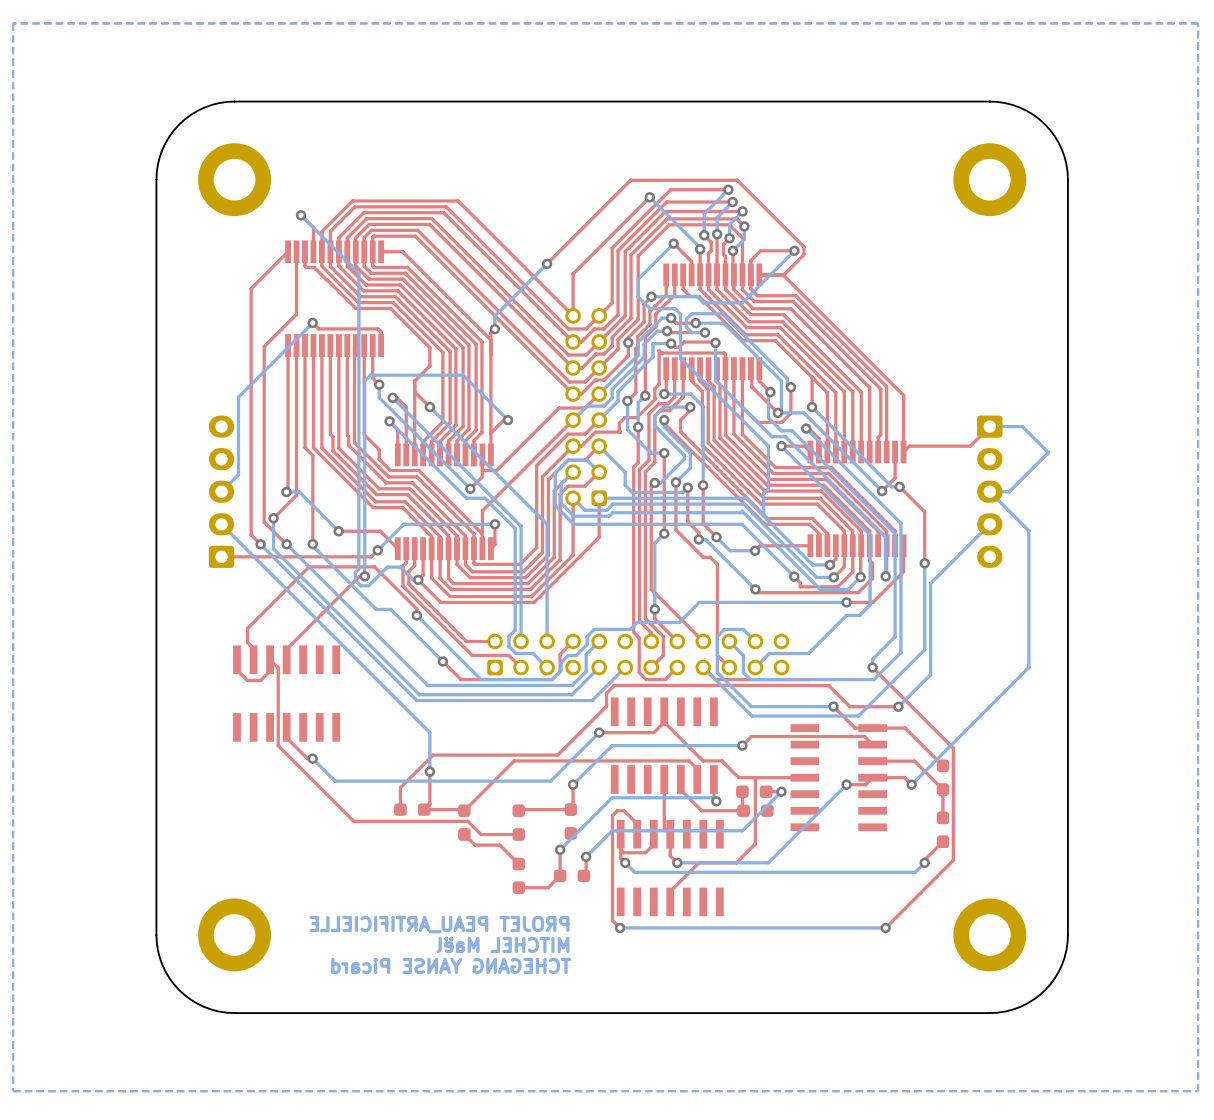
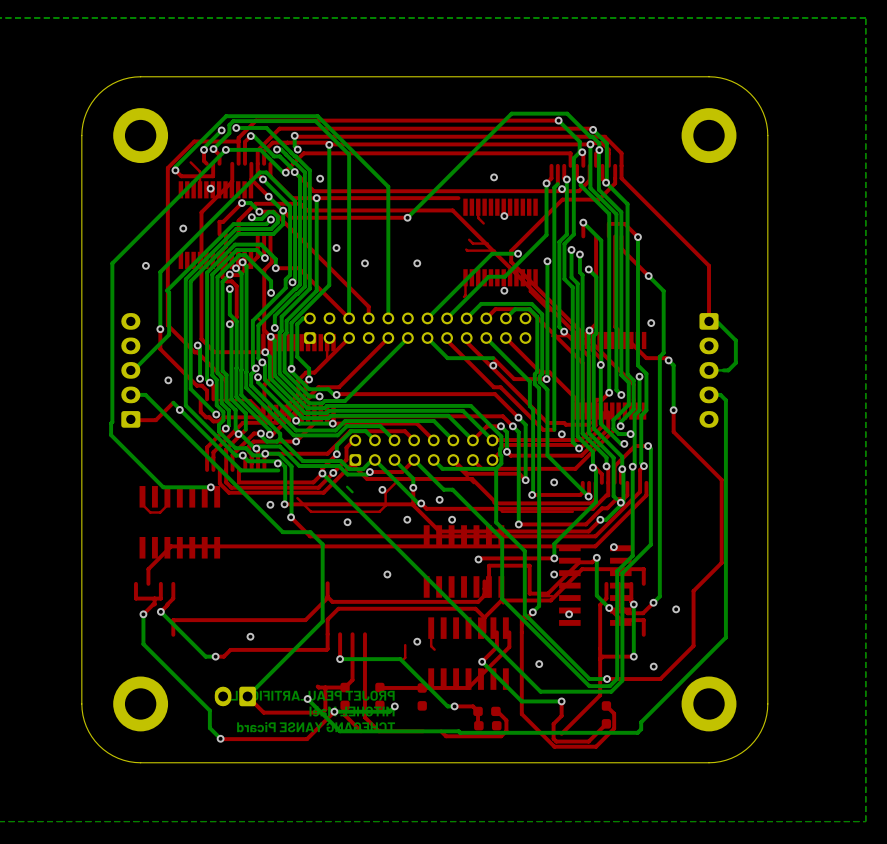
top track: none -> (558, 120) (256, 120) (238, 138) (238, 163)
bottom track: none -> (558, 120) (579, 141) (579, 152)
via: none -> (558, 120)
bottom track: none -> (236, 128) (266, 128) (309, 170) (309, 288) (281, 316) (279, 373) (309, 403) (344, 401) (407, 338)
via: none -> (236, 128)
bottom track: none -> (221, 130) (204, 149)
via: none -> (221, 130)
top track: none -> (593, 129) (279, 128) (257, 150) (257, 176) (263, 179)
bottom track: none -> (593, 129) (606, 143) (606, 182) (627, 204) (627, 374) (633, 380) (633, 409) (620, 422) (620, 426)
via: none -> (593, 129)
top track: none -> (250, 136) (244, 141) (244, 163)
bottom track: none -> (250, 136) (253, 136) (274, 156) (279, 156) (299, 177) (299, 284) (258, 325) (258, 358) (264, 364) (264, 379) (303, 418) (328, 418) (330, 415) (448, 415) (472, 440)
via: none -> (250, 136)
bottom track: none -> (294, 135) (294, 146) (297, 149)
via: none -> (294, 135)
top track: none -> (238, 141) (194, 141) (167, 168) (167, 325) (226, 381) (226, 399)
top track: none -> (287, 142) (272, 142) (264, 151) (264, 163)
top track: none -> (287, 142) (327, 142) (329, 144) (602, 143) (608, 149) (608, 165)
top track: (728, 189) (670, 189) (612, 248) (612, 302) (586, 328) (568, 328) (446, 206) (355, 206) (330, 231) (330, 266) (360, 296) (395, 296) (450, 351) (450, 423) (431, 441) (431, 454) -> none
bottom track: (728, 189) (704, 213) (704, 235) -> none
via: (728, 189) -> none
bottom track: none -> (590, 144) (590, 188) (616, 214) (616, 390) (621, 394)
via: none -> (590, 144)
bottom track: none -> (329, 144) (329, 285) (291, 322) (291, 371) (309, 389) (328, 389) (333, 394)
via: none -> (329, 144)
top track: none -> (213, 149) (219, 155) (219, 163)
bottom track: none -> (213, 149) (229, 133) (229, 125) (233, 121) (315, 121) (349, 154) (349, 318)
via: none -> (213, 149)
top track: (649, 197) (573, 273) (573, 315) (458, 201) (352, 201) (321, 231) (321, 266) (358, 302) (393, 302) (442, 352) (442, 421) (423, 441) (423, 454) -> none
bottom track: (649, 197) (700, 249) -> none
via: (649, 197) -> none
top track: none -> (204, 149) (204, 161) (206, 163)
via: none -> (204, 149)
via: none -> (225, 149)
bottom track: none -> (277, 149) (281, 149) (304, 172) (304, 286) (274, 316) (274, 328)
via: none -> (277, 149)
via: none -> (297, 149)
via: none -> (599, 150)
bottom track: none -> (579, 152) (573, 158) (573, 234) (564, 243) (564, 279) (572, 287) (572, 442) (579, 448)
top track: none -> (582, 152) (583, 165)
via: none -> (582, 152)
top track: (732, 202) (666, 202) (618, 250) (618, 314) (603, 328) (594, 328) (581, 341) (573, 341) (443, 212) (363, 212) (338, 237) (338, 266) (363, 290) (397, 290) (455, 348) (455, 425) (440, 441) (440, 454) -> none
bottom track: (732, 202) (717, 217) (717, 234) -> none
via: (732, 202) -> none
top track: none -> (596, 153) (596, 165)
top track: (742, 211) (665, 211) (625, 251) (625, 315) (586, 355) (568, 355) (431, 218) (366, 218) (347, 237) (347, 266) (366, 284) (400, 284) (463, 347) (463, 426) (448, 441) (448, 454) -> none
bottom track: (742, 211) (729, 224) (729, 238) -> none
via: (742, 211) -> none
bottom track: (301, 215) (358, 273) (358, 568) (355, 572) (355, 580) (360, 585) (368, 585) (387, 567) (400, 567) (413, 579) (418, 579) -> none
via: (301, 215) -> none
top track: none -> (213, 163) (213, 176) (181, 176) (175, 170)
top track: none -> (232, 163) (232, 181) (201, 212) (201, 339) (214, 352) (265, 352)
top track: none -> (251, 163) (251, 179) (268, 196)
top track: none -> (270, 163) (270, 176) (292, 198) (458, 198)
top track: none -> (551, 165) (551, 178) (546, 183)
top track: none -> (557, 165) (557, 184)
top track: none -> (564, 165) (564, 178) (566, 179)
top track: none -> (570, 165) (570, 153) (303, 153) (285, 172)
top track: none -> (576, 165) (576, 178) (580, 179)
top track: none -> (589, 165) (589, 180) (578, 191) (313, 191) (294, 172)
top track: none -> (602, 165) (602, 179) (606, 182)
top track: none -> (615, 165) (615, 183) (598, 199) (562, 199) (511, 250) (511, 262) (633, 384) (633, 412)
bottom track: none -> (175, 170) (175, 166) (226, 116) (317, 116) (388, 186) (388, 318)
via: none -> (175, 170)
top track: (744, 226) (736, 218) (666, 218) (631, 254) (631, 318) (612, 337) (612, 345) (604, 354) (596, 354) (582, 368) (573, 368) (429, 224) (369, 224) (355, 237) (355, 266) (368, 279) (402, 279) (468, 345) (468, 429) (457, 440) (457, 454) -> none
bottom track: (744, 226) (744, 239) (732, 250) -> none
via: (744, 226) -> none
bottom track: none -> (285, 172) (283, 172) (260, 149) (225, 149) (112, 263) (111, 435) (163, 487) (210, 487)
via: none -> (285, 172)
via: none -> (294, 172)
top track: (717, 234) (717, 289) (749, 321) (782, 321) (852, 391) (852, 452) -> none
via: (717, 234) -> none
top track: (704, 235) (711, 242) (711, 250) (708, 253) (708, 289) (746, 327) (780, 327) (844, 391) (844, 452) -> none
bottom track: none -> (263, 179) (290, 206) (290, 275) (285, 279) (285, 288) (252, 320) (253, 368)
via: none -> (263, 179)
via: none -> (320, 178)
top track: (729, 238) (723, 244) (725, 289) (750, 314) (783, 314) (861, 392) (861, 452) -> none
via: (729, 238) -> none
bottom track: none -> (566, 179) (566, 234) (559, 241) (559, 326) (564, 331)
via: none -> (566, 179)
bottom track: none -> (580, 179) (580, 185) (609, 213) (609, 392)
via: none -> (580, 179)
via: none -> (606, 182)
top track: (673, 243) (691, 261) (691, 274) -> none
bottom track: (673, 243) (638, 279) (638, 296) (650, 308) (674, 308) (680, 314) (680, 358) (768, 446) (768, 488) (763, 493) (763, 515) -> none
via: (673, 243) -> none
bottom track: none -> (546, 183) (546, 234) (504, 276) (488, 276) (447, 318)
via: none -> (546, 183)
bottom track: none -> (557, 184) (554, 187) (554, 429)
top track: (700, 249) (700, 289) (745, 334) (777, 334) (835, 392) (835, 452) -> none
via: (700, 249) -> none
via: none -> (210, 188)
top track: (732, 250) (733, 289) (753, 308) (790, 308) (869, 387) (869, 452) -> none
via: (732, 250) -> none
top track: (794, 250) (760, 250) (750, 260) (750, 289) (757, 295) (795, 295) (886, 386) (886, 452) -> none
bottom track: (794, 250) (742, 302) (703, 302) (697, 296) (651, 296) -> none
top track: (288, 251) (251, 288) (251, 534) (260, 544) -> none
top track: (296, 251) (296, 314) (264, 346) (264, 522) (286, 544) -> none
top track: (304, 251) (304, 266) (314, 267) (355, 308) (390, 308) (429, 347) (429, 365) (414, 381) (414, 454) -> none
top track: (381, 251) (402, 251) (490, 340) -> none
bottom track: none -> (268, 196) (283, 210) (283, 224) (273, 233) (238, 233) (190, 281) (190, 388) (216, 414)
via: none -> (268, 196)
bottom track: none -> (316, 198) (316, 290) (286, 320) (284, 371) (309, 396) (319, 396)
via: none -> (316, 198)
top track: (547, 263) (630, 180) (737, 180) (803, 246) (803, 254) (783, 274) (759, 274) -> none
bottom track: (547, 263) (494, 316) (494, 329) -> none
via: (547, 263) -> none
top track: none -> (241, 203) (223, 221) (219, 221) (219, 234)
bottom track: none -> (241, 203) (250, 203) (259, 211)
via: none -> (241, 203)
top track: (666, 274) (666, 295) (649, 311) (649, 324) (637, 336) (635, 392) (627, 401) -> none
top track: (674, 274) (674, 295) (655, 313) (655, 326) (645, 337) (645, 395) -> none
top track: (783, 274) (903, 395) (903, 452) (909, 446) (970, 446) (989, 426) -> (294, 135) (604, 136) (621, 153) (621, 178) (709, 265) (709, 321)
top track: none -> (283, 210) (290, 217) (407, 217)
via: none -> (283, 210)
top track: none -> (259, 211) (273, 211) (368, 306) (368, 318)
via: none -> (259, 211)
via: none -> (504, 216)
bottom track: none -> (251, 217) (261, 218) (268, 212) (273, 212) (277, 216) (277, 222) (271, 229) (236, 229) (185, 279) (185, 405) (235, 455) (242, 455) (248, 461) (279, 461) (285, 467) (284, 504)
via: none -> (251, 217)
bottom track: none -> (407, 217) (511, 113) (567, 113) (590, 136) (592, 136) (599, 143) (598, 189) (621, 212) (621, 375) (628, 382) (628, 404) (613, 420) (613, 428) (618, 434) (627, 434)
via: none -> (407, 217)
via: none -> (270, 219)
top track: none -> (583, 222) (583, 236)
bottom track: none -> (583, 222) (601, 240) (600, 423) (620, 443) (624, 443)
via: none -> (583, 222)
top track: (651, 296) (644, 304) (644, 321) (628, 337) (628, 355) (604, 380) (595, 380) (581, 394) (573, 394) (415, 236) (374, 236) (374, 267) (407, 267) (481, 341) (481, 432) (473, 440) (473, 454) -> none
via: (651, 296) -> none
top track: (690, 296) (699, 296) (743, 340) (775, 340) (827, 392) (827, 452) -> none
via: none -> (183, 228)
top track: none -> (225, 234) (225, 246) (222, 250) (222, 276) (236, 286) (236, 317) (229, 324)
top track: none -> (238, 234) (238, 220) (255, 203) (300, 203) (307, 210) (452, 210) (600, 358) (600, 364)
top track: none -> (257, 234) (257, 256) (239, 275) (229, 274)
top track: none -> (264, 234) (264, 258)
top track: none -> (270, 234) (271, 262) (264, 270) (264, 330) (272, 338) (272, 376) (264, 384) (264, 399)
top track: none -> (596, 236) (596, 323) (589, 330)
top track: none -> (608, 236) (608, 223) (624, 223) (637, 237)
top track: none -> (615, 236) (615, 326) (646, 358) (666, 358) (668, 360)
top track: none -> (621, 236) (621, 248) (648, 276)
bottom track: none -> (637, 237) (637, 365) (646, 373) (646, 410) (641, 415) (641, 463) (643, 466)
via: none -> (637, 237)
bottom track: (671, 318) (662, 318) (638, 341) (638, 355) (599, 394) -> none
via: (671, 318) -> none
top track: (312, 322) (318, 328) (377, 328) (381, 332) (381, 345) -> none
bottom track: (312, 322) (238, 397) (238, 474) (221, 491) -> (270, 219) (266, 224) (233, 224) (167, 290) (169, 292) (169, 334) (133, 370) (130, 370)
via: (312, 322) -> none
bottom track: (695, 323) (723, 323) (781, 381) (781, 409) (777, 412) (803, 412) (882, 491) -> none
via: (695, 323) -> none
top track: (494, 329) (490, 333) (490, 454) -> none
bottom track: (667, 331) (657, 331) (644, 344) (644, 357) (612, 389) (612, 398) (604, 406) (587, 406) (573, 420) -> none
via: (667, 331) -> none
bottom track: none -> (571, 249) (571, 277) (577, 283) (577, 436) (592, 451) (592, 467) (595, 470) (595, 502) (554, 543) (554, 558)
via: none -> (571, 249)
bottom track: (705, 332) (691, 332) (686, 327) (686, 319) (691, 313) (722, 313) (787, 378) (787, 383) (790, 387) -> none
via: (705, 332) -> none
bottom track: none -> (518, 253) (492, 253) (427, 318)
via: none -> (518, 253)
bottom track: none -> (579, 254) (579, 272) (582, 275) (582, 433) (606, 457) (606, 466)
via: none -> (579, 254)
bottom track: none -> (264, 258) (256, 250) (236, 250) (212, 274) (212, 375) (216, 379) (216, 405) (223, 411) (223, 420) (218, 424) (218, 431) (235, 448) (245, 448) (253, 455) (278, 453) (291, 466) (291, 517)
via: none -> (264, 258)
via position: (628, 342) -> (417, 263)
top track: (715, 342) (684, 342) (679, 347) (671, 343) -> none
bottom track: (715, 342) (715, 380) (772, 436) (785, 436) (885, 536) (885, 576) -> none
via: (715, 342) -> none
bottom track: (653, 343) (653, 356) (618, 391) (618, 401) (599, 420) -> none
bottom track: (671, 343) (653, 343) -> none
via: (671, 343) -> none
top track: (288, 345) (288, 490) (286, 492) -> none
top track: (296, 345) (296, 495) (273, 518) -> none
top track: (304, 345) (304, 447) (312, 455) (312, 544) -> none
top track: (313, 345) (313, 447) (373, 507) (402, 507) (431, 536) (431, 578) (450, 596) (531, 596) (573, 555) (573, 498) -> none
top track: (321, 345) (321, 448) (375, 501) (405, 501) (440, 536) (440, 578) (451, 589) (530, 589) (560, 559) (560, 494) (568, 486) (585, 486) (599, 472) -> none
top track: (330, 345) (330, 434) (332, 436) (332, 450) (376, 494) (407, 494) (448, 535) (448, 578) (453, 583) (528, 583) (554, 557) (554, 491) (573, 472) -> none
top track: (338, 345) (338, 448) (379, 488) (409, 488) (457, 535) (457, 564) (470, 577) (525, 577) (548, 554) (548, 479) (568, 460) (585, 460) (599, 446) -> none
top track: (347, 345) (348, 445) (386, 482) (412, 482) (465, 535) (465, 564) (472, 571) (523, 571) (542, 552) (542, 476) (573, 446) (581, 446) (595, 432) (620, 432) (619, 423) (624, 417) (636, 417) (655, 398) (654, 388) (659, 384) (659, 350) (661, 353) (724, 353) (725, 435) (769, 479) (826, 479) (878, 531) (878, 545) -> none
top track: (355, 345) (354, 442) (388, 476) (417, 476) (473, 533) (474, 564) (520, 564) (536, 547) (536, 465) (568, 434) (585, 434) (599, 420) -> none
top track: (364, 345) (364, 434) (379, 449) (379, 459) (390, 470) (418, 470) (482, 534) -> none
top track: (372, 345) (372, 378) (379, 384) -> none
bottom track: none -> (547, 261) (546, 379)
via: none -> (547, 261)
bottom track: none -> (242, 262) (246, 266) (246, 387) (293, 435) (337, 435) (346, 426) (380, 426) (394, 440)
via: none -> (242, 262)
via: none -> (364, 263)
via: none -> (145, 265)
top track: none -> (275, 268) (298, 268) (349, 318)
bottom track: none -> (275, 268) (275, 259) (261, 244) (235, 244) (207, 272) (207, 379) (209, 382)
via: none -> (275, 268)
bottom track: none -> (236, 268) (241, 273) (241, 395) (280, 433) (280, 438)
via: none -> (236, 268)
bottom track: none -> (588, 269) (596, 277) (596, 333) (593, 336) (593, 428) (622, 456) (623, 470) (623, 502) (606, 519) (600, 519)
via: none -> (588, 269)
bottom track: none -> (229, 274) (222, 281) (222, 371) (226, 375) (226, 401) (235, 410) (235, 429) (254, 448) (258, 446) (279, 446) (299, 466) (339, 466) (347, 474) (367, 474) (369, 472)
via: none -> (229, 274)
bottom track: none -> (648, 276) (663, 291) (663, 352) (659, 356) (659, 596) (653, 602)
via: none -> (648, 276)
top track: (674, 368) (674, 396) (667, 403) (659, 403) (648, 413) (648, 460) (639, 469) (639, 621) (651, 632) (651, 641) -> none
top track: (683, 368) (683, 396) (669, 410) (660, 410) (654, 416) (654, 462) (645, 472) (645, 618) (663, 636) (663, 655) (651, 667) -> none
top track: (691, 368) (691, 380) (702, 391) (702, 445) (761, 504) (817, 504) (844, 531) (844, 566) (833, 577) -> none
top track: (700, 368) (700, 381) (708, 389) (708, 442) (763, 498) (820, 498) (852, 531) (852, 571) (837, 586) (800, 586) (800, 582) (794, 576) -> none
top track: (708, 368) (708, 381) (714, 386) (714, 440) (764, 491) (821, 491) (861, 531) (860, 577) -> none
top track: (717, 368) (717, 381) (719, 384) (719, 437) (767, 485) (823, 485) (869, 531) (869, 560) (872, 563) (872, 578) (858, 592) (758, 592) (755, 589) -> none
top track: (733, 368) (733, 434) (773, 473) (828, 473) (886, 531) (885, 576) -> none
top track: (742, 368) (742, 434) (775, 467) (831, 467) (895, 531) (895, 545) -> none
bottom track: none -> (292, 282) (295, 279) (295, 201) (266, 172) (259, 172) (160, 272) (160, 329)
via: none -> (292, 282)
top track: (812, 377) (812, 407) -> none
bottom track: none -> (229, 289) (229, 314) (236, 321) (236, 397) (269, 430) (269, 434)
via: none -> (229, 289)
bottom track: (379, 384) (379, 397) (470, 488) -> none
via: (379, 384) -> none
via: none -> (504, 290)
top track: (790, 387) (790, 413) (781, 422) (757, 422) (742, 407) -> none
via: (790, 387) -> none
bottom track: none -> (271, 292) (271, 281) (245, 255) (239, 255) (217, 277) (217, 372) (221, 377) (221, 403) (228, 410) (228, 425) (225, 428)
via: none -> (271, 292)
top track: (414, 391) (429, 407) -> none
bottom track: (770, 392) (768, 394) (768, 417) (781, 430) (792, 430) (895, 533) (895, 636) (872, 659) (872, 667) -> none
via: (770, 392) -> none
top track: (599, 394) (585, 408) (559, 408) (496, 470) (482, 469) -> none
bottom track: (664, 394) (690, 394) (703, 406) (703, 485) -> none
via: (664, 394) -> none
bottom track: (645, 395) (638, 402) (638, 427) -> none
via: (645, 395) -> none
top track: (392, 397) (396, 397) (406, 407) (406, 454) -> none
bottom track: (392, 397) (521, 526) (521, 641) -> none
via: (392, 397) -> none
bottom track: (627, 401) (627, 429) (650, 453) (664, 453) -> none
via: (627, 401) -> none
bottom track: (429, 407) (547, 524) (547, 641) -> none
via: (429, 407) -> none
part rotation: 0° (586, 407) -> 90° clockwise (423, 450)
part position: (586, 407) -> (423, 450)
top track: (690, 407) (690, 410) (680, 420) (680, 431) (767, 518) (812, 518) (827, 533) (827, 545) -> none
bottom track: (690, 407) (663, 407) (654, 416) (654, 425) (684, 455) (684, 459) (660, 482) (654, 482) -> none
via: (690, 407) -> none
bottom track: (812, 407) (891, 486) (899, 486) -> none
via: (812, 407) -> none
via: (777, 412) -> none
top track: (508, 420) (503, 420) (490, 433) -> none
bottom track: (508, 420) (463, 375) (370, 375) (364, 381) (364, 576) -> none
via: (508, 420) -> none
top track: (573, 420) (482, 510) (482, 548) -> none
top track: (664, 420) (664, 423) (764, 524) (809, 524) (818, 533) (818, 545) -> none
bottom track: (664, 420) (664, 427) (690, 453) (690, 467) (675, 482) -> none
via: (664, 420) -> none
bottom track: (389, 421) (466, 498) (484, 498) (515, 528) (515, 630) (508, 636) (508, 646) -> none
via: (389, 421) -> none
bottom track: none -> (309, 318) (303, 318) (297, 324) (297, 356) (309, 368) (309, 379)
bottom track: none -> (466, 318) (481, 303) (531, 303) (542, 314) (542, 373) (539, 376) (539, 381) (547, 389) (547, 455) (588, 496)
top track: none -> (486, 318) (495, 309) (528, 309) (582, 363) (582, 412)
bottom track: none -> (505, 318) (515, 309) (529, 309) (537, 316) (537, 371) (534, 374) (534, 384) (539, 388) (539, 605) (532, 612)
bottom track: (1000, 426) (1022, 426) (1048, 452) (1009, 491) -> (716, 321) (735, 340) (735, 362) (728, 370) (723, 370)
top track: (638, 427) (638, 462) (633, 467) (633, 632) (639, 637) (639, 672) (646, 679) (665, 679) (677, 667) -> none
via: (638, 427) -> none
bottom track: (806, 428) (900, 523) (900, 652) (873, 679) (750, 679) (743, 672) (743, 655) (729, 641) -> none
via: (806, 428) -> none
via: none -> (651, 323)
bottom track: none -> (229, 324) (231, 325) (231, 399) (245, 413) (245, 429)
via: none -> (229, 324)
via: none -> (274, 328)
top track: none -> (160, 329) (160, 349) (196, 385) (201, 385) (207, 390) (207, 399)
via: none -> (160, 329)
bottom track: none -> (589, 330) (588, 432) (613, 457) (613, 496) (616, 499)
via: none -> (589, 330)
top track: none -> (564, 331) (589, 356) (589, 424) (547, 422) (466, 342) (466, 338)
via: none -> (564, 331)
bottom track: (599, 446) (625, 472) (625, 485) (632, 492) (683, 492) (687, 487) -> none
bottom track: (781, 446) (870, 534) (870, 604) (859, 615) (846, 615) (808, 653) (769, 653) (755, 667) -> none
via: (781, 446) -> none
bottom track: none -> (270, 336) (274, 340) (274, 375) (307, 408) (324, 408) (326, 405) (470, 405) (501, 436) (501, 463) (496, 468)
via: none -> (270, 336)
top track: none -> (349, 338) (314, 372) (306, 372) (298, 380) (298, 394) (275, 417) (223, 417) (219, 421) (213, 421) (200, 411) (200, 399)
top track: none -> (388, 338) (339, 387) (318, 387) (272, 434) (269, 434)
bottom track: none -> (427, 338) (447, 358) (493, 358)
top track: none -> (447, 338) (447, 340) (493, 387) (500, 387) (543, 429) (554, 429)
bottom track: none -> (486, 338) (529, 381) (529, 406) (533, 409) (532, 494)
top track: none -> (505, 338) (540, 372) (549, 372) (576, 399) (576, 412)
top track: (878, 452) (878, 437) (880, 434) (880, 389) (793, 301) (754, 301) (742, 289) (742, 237) (729, 224) (669, 224) (638, 255) (638, 319) (618, 339) (618, 349) (585, 382) (569, 382) (417, 230) (371, 230) (364, 237) (364, 266) (371, 273) (405, 273) (476, 344) (476, 430) (465, 440) (465, 454) -> none
top track: (895, 452) (895, 478) (882, 491) -> none
top track: (664, 453) (664, 533) -> none
via: (664, 453) -> none
bottom track: none -> (197, 345) (200, 347) (200, 378)
via: none -> (197, 345)
bottom track: none -> (265, 352) (269, 356) (269, 377) (305, 413) (326, 413) (328, 410) (462, 410) (492, 440)
via: none -> (265, 352)
bottom track: (573, 472) (561, 484) (561, 503) (573, 516) (609, 516) (612, 512) (742, 511) -> none
bottom track: (599, 472) (587, 460) (568, 460) (555, 473) (555, 505) (573, 524) (741, 524) (794, 576) -> none
top track: none -> (493, 358) (514, 379) (546, 379)
bottom track: none -> (668, 360) (673, 365) (673, 410)
via: none -> (668, 360)
via: none -> (262, 362)
top track: (654, 482) (651, 486) (651, 589) (703, 641) -> none
via: (654, 482) -> none
top track: (675, 482) (675, 529) (703, 557) (710, 557) (717, 564) (717, 655) (729, 667) -> none
via: (675, 482) -> none
via: none -> (600, 364)
top track: (703, 485) (703, 523) (716, 537) -> none
top track: (899, 486) (924, 511) (924, 563) -> none
via: (899, 486) -> none
top track: (687, 487) (687, 521) (698, 532) (698, 539) -> none
via: (687, 487) -> none
via: (470, 488) -> none
bottom track: none -> (253, 368) (251, 374) (251, 385) (296, 430) (335, 430) (345, 421) (433, 421) (453, 440)
via: none -> (255, 368)
via: none -> (291, 368)
via: (882, 491) -> none
bottom track: (989, 491) (1028, 530) (1028, 667) (911, 784) -> none
bottom track: (286, 492) (299, 492) (338, 531) -> none
via: (286, 492) -> none
bottom track: (573, 498) (585, 510) (606, 510) (613, 504) (743, 504) (753, 513) -> none
top track: (599, 498) (599, 537) (534, 602) (440, 602) (418, 579) (423, 575) (423, 548) -> none
bottom track: (599, 498) (746, 498) (812, 564) (829, 564) -> none
bottom track: none -> (258, 377) (258, 382) (299, 423) (332, 423)
via: none -> (258, 377)
bottom track: none -> (639, 376) (639, 410) (634, 415) (632, 555) (617, 571) (617, 678) (609, 686) (589, 686) (502, 598) (502, 539) (452, 489) (443, 489) (414, 460)
via: none -> (639, 376)
via: none -> (200, 378)
top track: none -> (309, 379) (305, 383) (305, 394) (277, 422) (242, 422) (213, 452) (213, 469)
via: none -> (309, 379)
via: none -> (546, 379)
via: none -> (168, 380)
top track: none -> (209, 382) (213, 386) (213, 399)
via: none -> (209, 382)
bottom track: (742, 511) (820, 589) (848, 589) (860, 577) -> none
bottom track: (753, 513) (816, 577) (833, 577) -> none
bottom track: (273, 518) (273, 549) (419, 694) (571, 694) (599, 667) -> none
via: (273, 518) -> none
top track: none -> (609, 392) (602, 399) (595, 399) (595, 425) (581, 440) (492, 440)
via: none -> (609, 392)
top track: none -> (333, 394) (494, 394) (518, 417)
bottom track: (221, 524) (429, 732) (429, 771) -> (130, 394) (145, 394) (282, 532) (310, 532) (322, 544) (322, 621) (247, 696)
top track: (494, 524) (494, 544) (490, 548) -> none
bottom track: (494, 524) (403, 524) (377, 550) -> none
via: none -> (621, 394)
bottom track: (989, 524) (930, 583) (930, 674) (898, 706) -> (709, 394) (720, 394) (725, 400) (725, 637) (641, 722) (641, 729) (637, 732) (339, 731) (307, 698)
via: none -> (319, 396)
via: (338, 531) -> none
bottom track: (664, 533) (654, 543) (654, 609) -> none
via: (664, 533) -> none
bottom track: none -> (173, 402) (241, 470) (278, 470)
bottom track: (716, 537) (730, 550) (755, 550) -> none
via: (716, 537) -> none
bottom track: (698, 539) (705, 539) (755, 589) -> none
via: (698, 539) -> none
bottom track: (260, 544) (416, 700) (592, 700) (625, 667) -> none
via: (260, 544) -> none
bottom track: (286, 544) (427, 685) (572, 685) (586, 671) (586, 654) (599, 641) -> none
bottom track: (312, 544) (376, 609) (390, 609) (442, 661) -> none
via: (312, 544) -> none
top track: none -> (673, 410) (673, 431) (721, 479) (721, 562) (693, 591) (693, 645) (660, 679) (607, 679)
via: none -> (673, 410)
top track: (810, 545) (759, 545) (755, 550) -> none
top track: (903, 545) (903, 571) (872, 602) (846, 602) -> none
top track: none -> (601, 412) (601, 426) (580, 448) (575, 444) (504, 444) (492, 460)
top track: none -> (608, 412) (608, 429) (581, 455) (510, 455) (506, 451)
top track: (406, 548) (406, 563) (402, 566) (402, 586) (472, 655) (508, 655) (521, 667) -> none
top track: (414, 548) (414, 565) (408, 571) (408, 583) (466, 641) (494, 641) -> none
via: none -> (216, 414)
top track: (377, 550) (371, 556) (221, 556) -> (173, 402) (155, 420) (130, 419)
via: (377, 550) -> none
via: (755, 550) -> none
bottom track: none -> (518, 417) (525, 424) (525, 480)
via: none -> (518, 417)
via: none -> (296, 420)
top track: none -> (332, 423) (416, 423) (433, 440)
via: none -> (332, 423)
bottom track: (924, 563) (924, 649) (858, 716) (751, 716) (703, 667) -> none
via: (924, 563) -> none
via: (829, 564) -> none
via: none -> (620, 426)
top track: none -> (500, 426) (487, 426) (472, 440)
bottom track: none -> (500, 426) (506, 432) (506, 451)
via: none -> (500, 426)
top track: none -> (512, 426) (502, 416) (321, 416) (296, 441) (253, 441) (249, 445) (249, 452) (251, 454) (251, 469)
bottom track: none -> (512, 426) (518, 432) (518, 524)
via: none -> (512, 426)
top track: none -> (225, 428) (207, 447) (207, 469)
via: none -> (225, 428)
top track: none -> (245, 429) (226, 449) (226, 482) (231, 487) (318, 487) (346, 459) (346, 447) (355, 440)
top track: none -> (613, 430) (575, 468) (481, 468) (472, 460)
top track: none -> (260, 433) (254, 433) (232, 454) (232, 469)
bottom track: none -> (260, 433) (266, 441) (277, 441) (280, 438)
via: none -> (260, 433)
top track: (364, 576) (359, 576) (286, 649) (286, 659) -> none
via: none -> (269, 434)
via: (833, 577) -> none
via: (860, 577) -> none
via: (418, 579) -> none
bottom track: none -> (280, 438) (302, 461) (341, 461) (349, 469) (362, 469) (372, 460) (374, 460) (418, 503) (421, 503)
bottom track: none -> (374, 440) (365, 431) (351, 431) (336, 445) (336, 454)
top track: none -> (414, 440) (404, 431) (350, 431) (327, 453) (265, 453) (264, 469)
via: none -> (296, 441)
via: (755, 589) -> none
via: none -> (624, 443)
top track: none -> (648, 446) (634, 446) (614, 466) (614, 482)
bottom track: none -> (648, 446) (650, 448) (650, 544) (622, 573) (622, 680) (611, 691) (540, 691) (322, 473)
via: none -> (648, 446)
top track: none -> (256, 448) (258, 469)
via: none -> (256, 448)
via: none -> (579, 448)
via: none -> (506, 451)
via: none -> (265, 453)
bottom track: (846, 602) (699, 602) (679, 622) (637, 622) (630, 629) (594, 629) (587, 636) (587, 644) (576, 655) (568, 655) (561, 662) (561, 670) (552, 679) (480, 679) (416, 615) -> none
via: (846, 602) -> none
top track: none -> (336, 454) (322, 468) (322, 473) (313, 482) (238, 482) (238, 469)
via: none -> (336, 454)
top track: none -> (242, 455) (245, 457) (245, 469)
via: none -> (242, 455)
via: (654, 609) -> none
bottom track: none -> (394, 460) (413, 478) (413, 487)
top track: none -> (414, 460) (402, 472) (369, 472)
bottom track: none -> (433, 460) (442, 468) (496, 468)
top track: none -> (453, 460) (467, 473) (519, 473) (525, 480)
top track: (416, 615) (416, 609) (374, 566) (309, 566) (247, 628) (247, 642) (253, 648) (253, 659) -> none
top track: none -> (352, 464) (367, 478) (472, 478) (496, 503) (591, 503) (595, 499) (595, 482)
top track: none -> (352, 464) (323, 492) (228, 492) (219, 483) (219, 469)
top track: none -> (643, 466) (640, 469) (640, 491) (595, 536) (310, 536) (291, 517)
via: none -> (643, 466)
top track: none -> (606, 466) (608, 468) (608, 495) (593, 508) (426, 508) (421, 503)
via: none -> (606, 466)
via: none -> (632, 466)
top track: none -> (592, 467) (601, 474) (601, 482)
via: none -> (592, 467)
bottom track: none -> (496, 468) (496, 522) (524, 551) (524, 614) (589, 679) (607, 679)
via: none -> (622, 469)
top track: none -> (620, 470) (620, 482)
via: none -> (369, 472)
via: none -> (322, 473)
via: none -> (333, 472)
via: none -> (525, 480)
via: none -> (554, 482)
bottom track: (755, 641) (743, 629) (724, 629) (717, 636) (717, 672) (751, 706) (833, 706) -> none
top track: none -> (582, 482) (582, 492) (580, 494) (532, 494)
top track: none -> (589, 482) (588, 496)
top track: none -> (627, 482) (627, 495) (623, 499) (616, 499) (607, 508) (602, 508) (585, 524) (518, 524)
top track: none -> (646, 482) (646, 495) (595, 546) (171, 546) (148, 569) (148, 583)
via: none -> (210, 487)
top track: none -> (413, 487) (413, 505) (439, 531) (588, 531) (600, 519)
via: none -> (413, 487)
via: none -> (382, 489)
bottom track: (516, 653) (533, 653) (547, 667) -> none
part position: (638, 654) -> (417, 328)
via: none -> (532, 494)
top track: (270, 659) (278, 667) (278, 745) (353, 821) (467, 821) (481, 834) (518, 834) -> none
via: none -> (588, 496)
via: (442, 661) -> none
via: none -> (439, 499)
top track: (872, 667) (953, 748) (953, 860) (885, 927) -> none
via: none -> (421, 503)
via: none -> (284, 504)
top track: none -> (413, 504) (284, 504)
via: none -> (270, 504)
via: none -> (291, 517)
via: none -> (407, 519)
via: none -> (452, 519)
via: none -> (600, 519)
via: none -> (347, 522)
via: none -> (518, 524)
top track: (833, 706) (855, 728) (905, 728) (942, 765) -> none
via: (833, 706) -> none
top track: (898, 706) (849, 706) (828, 685) (614, 685) (606, 693) (606, 706) (557, 755) (433, 755) (400, 787) (400, 809) -> none
via: (898, 706) -> none
via: none -> (613, 547)
top track: (286, 727) (286, 737) (307, 758) (312, 758) -> none
top track: (599, 732) (653, 732) (664, 722) (703, 760) (722, 760) (738, 777) (804, 777) -> none
bottom track: (599, 732) (550, 781) (335, 781) (312, 758) -> none
via: (599, 732) -> none
top track: none -> (596, 557) (592, 562) (579, 562) (548, 593) (529, 593) (529, 565) (489, 565) (489, 595) (484, 595)
bottom track: none -> (596, 557) (596, 595) (609, 608)
via: none -> (596, 557)
top track: none -> (554, 558) (478, 559)
via: none -> (554, 558)
via: none -> (478, 559)
top track: (872, 744) (864, 736) (751, 736) (742, 745) -> none
bottom track: (742, 745) (612, 745) (573, 784) -> none
via: (742, 745) -> none
via: (312, 758) -> none
top track: (872, 761) (914, 761) (942, 789) (942, 817) -> none
via: none -> (387, 574)
via: none -> (554, 574)
top track: (429, 771) (429, 803) (424, 809) (464, 810) (514, 760) (689, 760) (697, 769) (697, 779) -> none
via: (429, 771) -> none
top track: none -> (484, 581) (484, 595)
top track: none -> (327, 583) (327, 597) (305, 620) (173, 620) (173, 634)
top track: none -> (160, 583) (160, 598) (135, 598) (135, 583)
top track: none -> (173, 583) (173, 598) (160, 611)
top track: none -> (606, 583) (606, 598) (600, 604) (600, 695) (561, 733)
top track: none -> (618, 583) (618, 604) (627, 613) (643, 613) (653, 602)
top track: none -> (631, 583) (631, 601) (633, 604)
top track: none -> (643, 583) (643, 569) (582, 569) (550, 600) (501, 600) (484, 617)
top track: (755, 777) (755, 843) (736, 862) (698, 862) (670, 891) (670, 901) -> none
part: (942, 777) -> none
top track: (664, 779) (664, 828) (670, 834) (670, 855) (677, 862) -> none
top track: (680, 779) (680, 789) (701, 810) (743, 810) (742, 791) -> none
top track: (573, 784) (573, 807) (570, 809) (518, 810) -> none
via: (573, 784) -> none
bottom track: (846, 784) (768, 862) (677, 862) -> none
via: (846, 784) -> none
top track: (911, 784) (904, 777) (872, 777) (865, 784) (846, 784) -> none
via: (911, 784) -> none
top track: none -> (484, 595) (478, 601) (332, 601) (327, 597)
part: (754, 791) -> none
bottom track: (781, 791) (742, 830) (612, 830) (586, 856) -> none
via: (781, 791) -> none
top track: none -> (154, 598) (154, 604) (143, 614)
via: none -> (653, 602)
bottom track: (716, 801) (712, 797) (612, 797) (560, 849) -> none
via: (716, 801) -> none
bottom track: none -> (633, 604) (633, 656)
via: none -> (633, 604)
top track: none -> (609, 608) (621, 620) (643, 620) (643, 634)
via: none -> (609, 608)
part: (412, 809) -> none
via: none -> (676, 609)
part: (755, 810) -> none
bottom track: none -> (160, 611) (205, 656) (215, 656)
via: none -> (160, 611)
top track: none -> (532, 612) (527, 617) (521, 617) (521, 714) (554, 746) (596, 746) (614, 728) (614, 713) (606, 705)
via: none -> (532, 612)
bottom track: none -> (143, 614) (143, 644) (209, 710) (209, 728) (220, 738)
via: none -> (143, 614)
via: none -> (569, 614)
top track: none -> (484, 617) (475, 608) (338, 608) (327, 619) (326, 649) (230, 649) (223, 656) (215, 656)
top track: none -> (484, 617) (484, 632)
part: (570, 821) -> none
part: (464, 822) -> none
part: (518, 822) -> none
part: (942, 829) -> none
top track: (464, 834) (474, 845) (499, 845) (518, 863) -> none
top track: (637, 834) (637, 823) (624, 810) (617, 810) (612, 815) (612, 920) (620, 927) -> none
top track: (653, 834) (653, 844) (645, 852) (623, 852) (620, 849) -> none
top track: none -> (496, 632) (496, 647) (482, 661)
top track: none -> (509, 632) (509, 647) (468, 687) (379, 687)
top track: (942, 841) (924, 859) (924, 862) -> none
top track: none -> (340, 634) (340, 659)
top track: none -> (352, 634) (352, 680) (345, 687) (317, 686)
top track: none -> (364, 634) (364, 717) (378, 731) (423, 731)
via: none -> (250, 636)
top track: (560, 849) (560, 875) (548, 887) (518, 887) -> none
via: (560, 849) -> none
via: none -> (417, 641)
via: (586, 856) -> none
via: (625, 862) -> none
via position: (677, 862) -> (482, 661)
bottom track: (924, 862) (915, 872) (634, 872) (625, 862) -> none
via: (924, 862) -> none
via: none -> (215, 656)
top track: none -> (633, 656) (602, 656) (600, 659)
via: none -> (633, 656)
bottom track: none -> (340, 659) (400, 659) (447, 706) (454, 706)
via: none -> (340, 659)
part: (518, 875) -> none
part: (571, 875) -> none
bottom track: none -> (482, 661) (521, 701) (561, 701)
via: none -> (539, 664)
via: none -> (653, 666)
via: none -> (607, 679)
top track: none -> (325, 687) (325, 709) (322, 712) (263, 712) (247, 696)
part: none -> (235, 696)
part: none -> (345, 696)
part: none -> (379, 696)
part: none -> (422, 696)
via: (620, 927) -> none
bottom track: (885, 927) (620, 927) -> none
via: (885, 927) -> none
via: none -> (307, 698)
top track: none -> (561, 701) (561, 715) (553, 723) (553, 738) (556, 741) (588, 741) (606, 723)
via: none -> (561, 701)
top track: none -> (345, 705) (345, 715) (361, 731)
bottom track: none -> (394, 706) (389, 711) (334, 711)
via: none -> (394, 706)
top track: none -> (454, 706) (473, 706) (478, 711) (478, 725)
via: none -> (454, 706)
part: none -> (486, 711)
top track: none -> (495, 711) (506, 720) (506, 731) (501, 736) (446, 736) (441, 731)
top track: none -> (334, 711) (307, 739) (220, 738)
via: none -> (334, 711)
part: none -> (606, 714)
part: none -> (487, 725)
via: none -> (220, 738)

